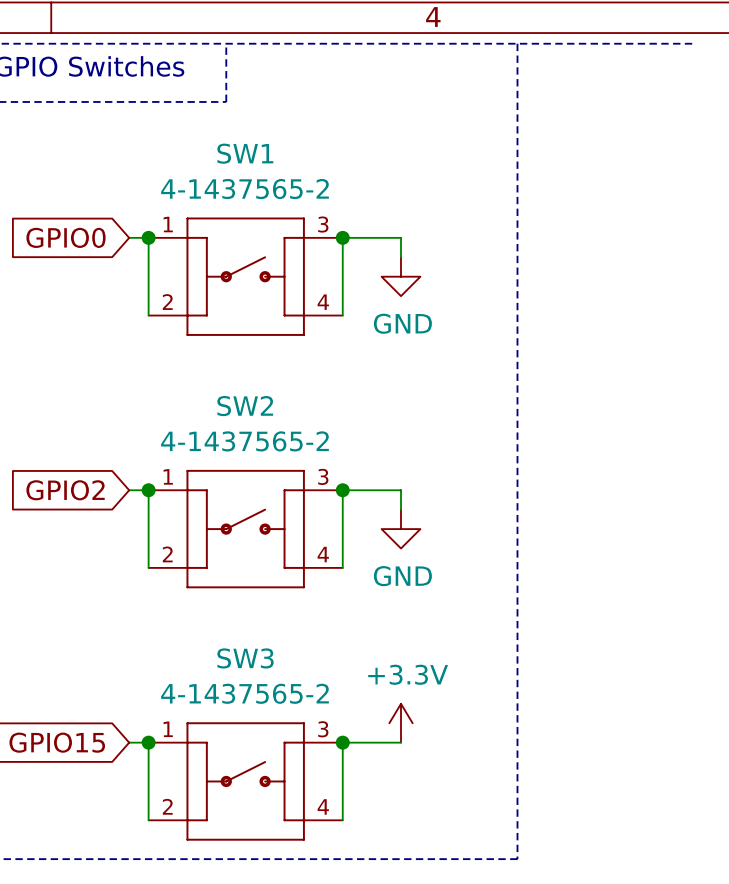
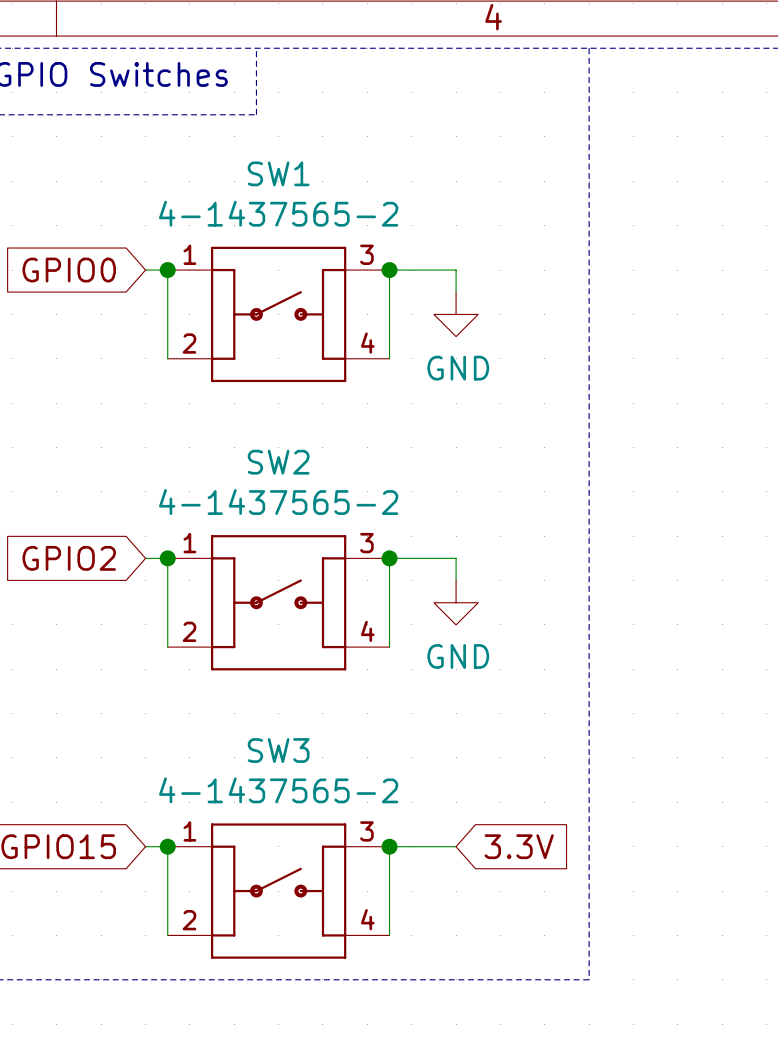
power symbol: +3.3V (401, 723) -> none
global label: none -> 3.3V (519, 846)

